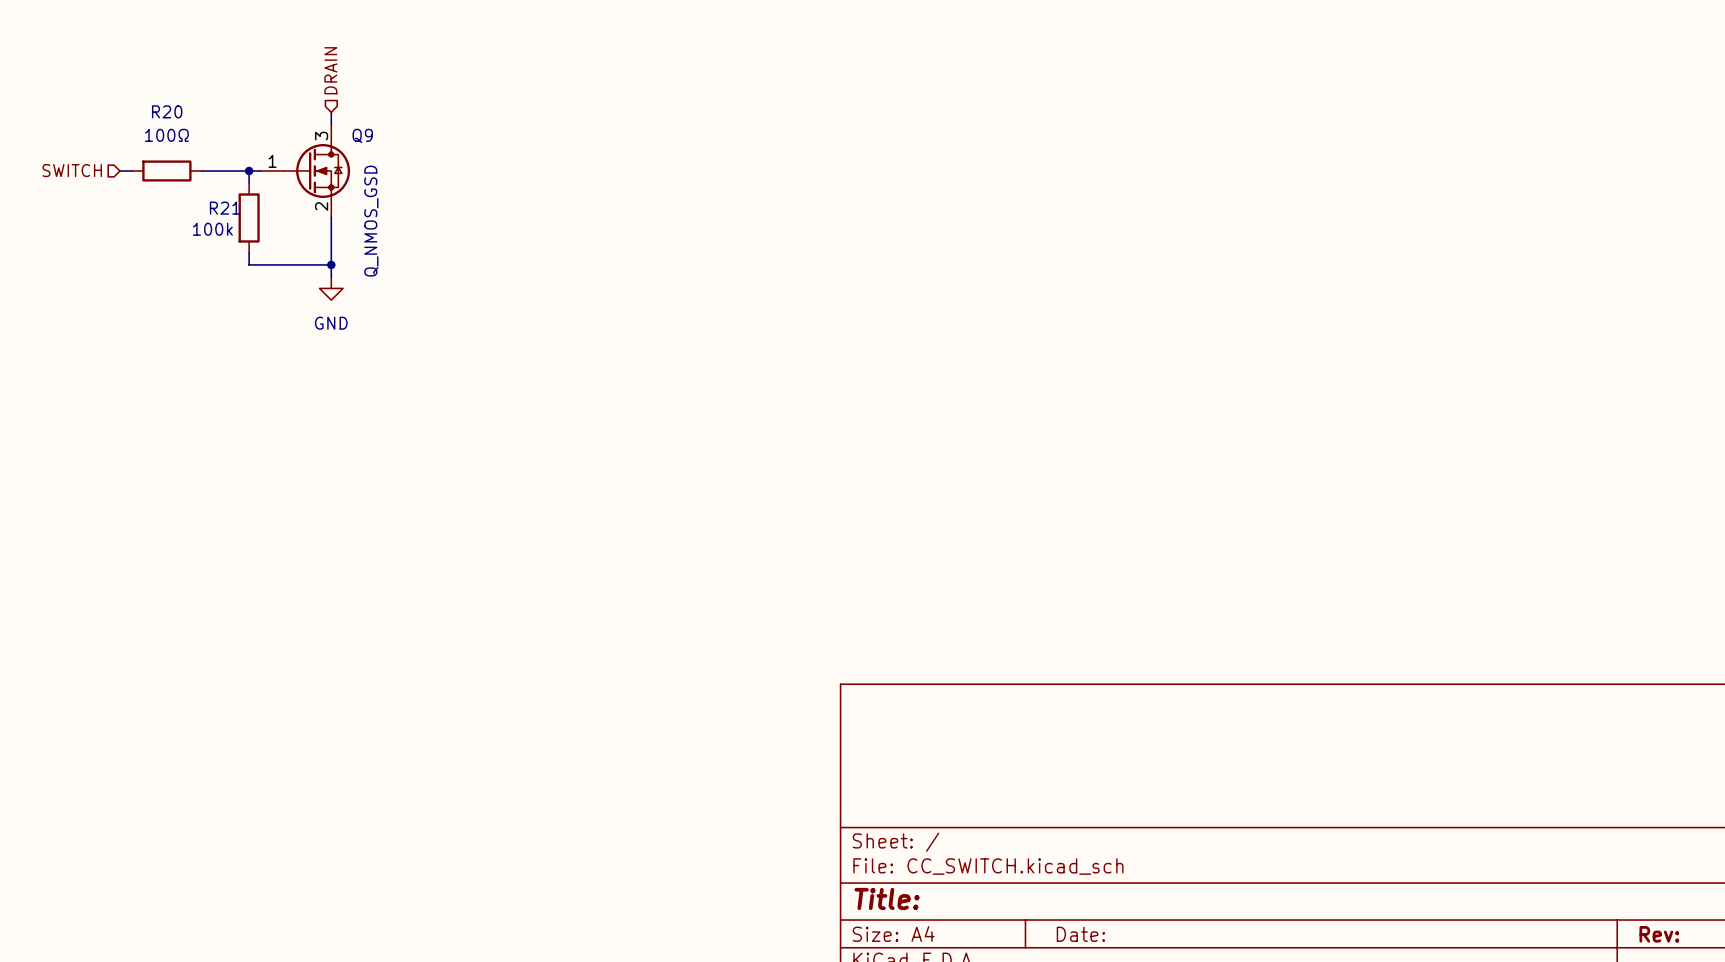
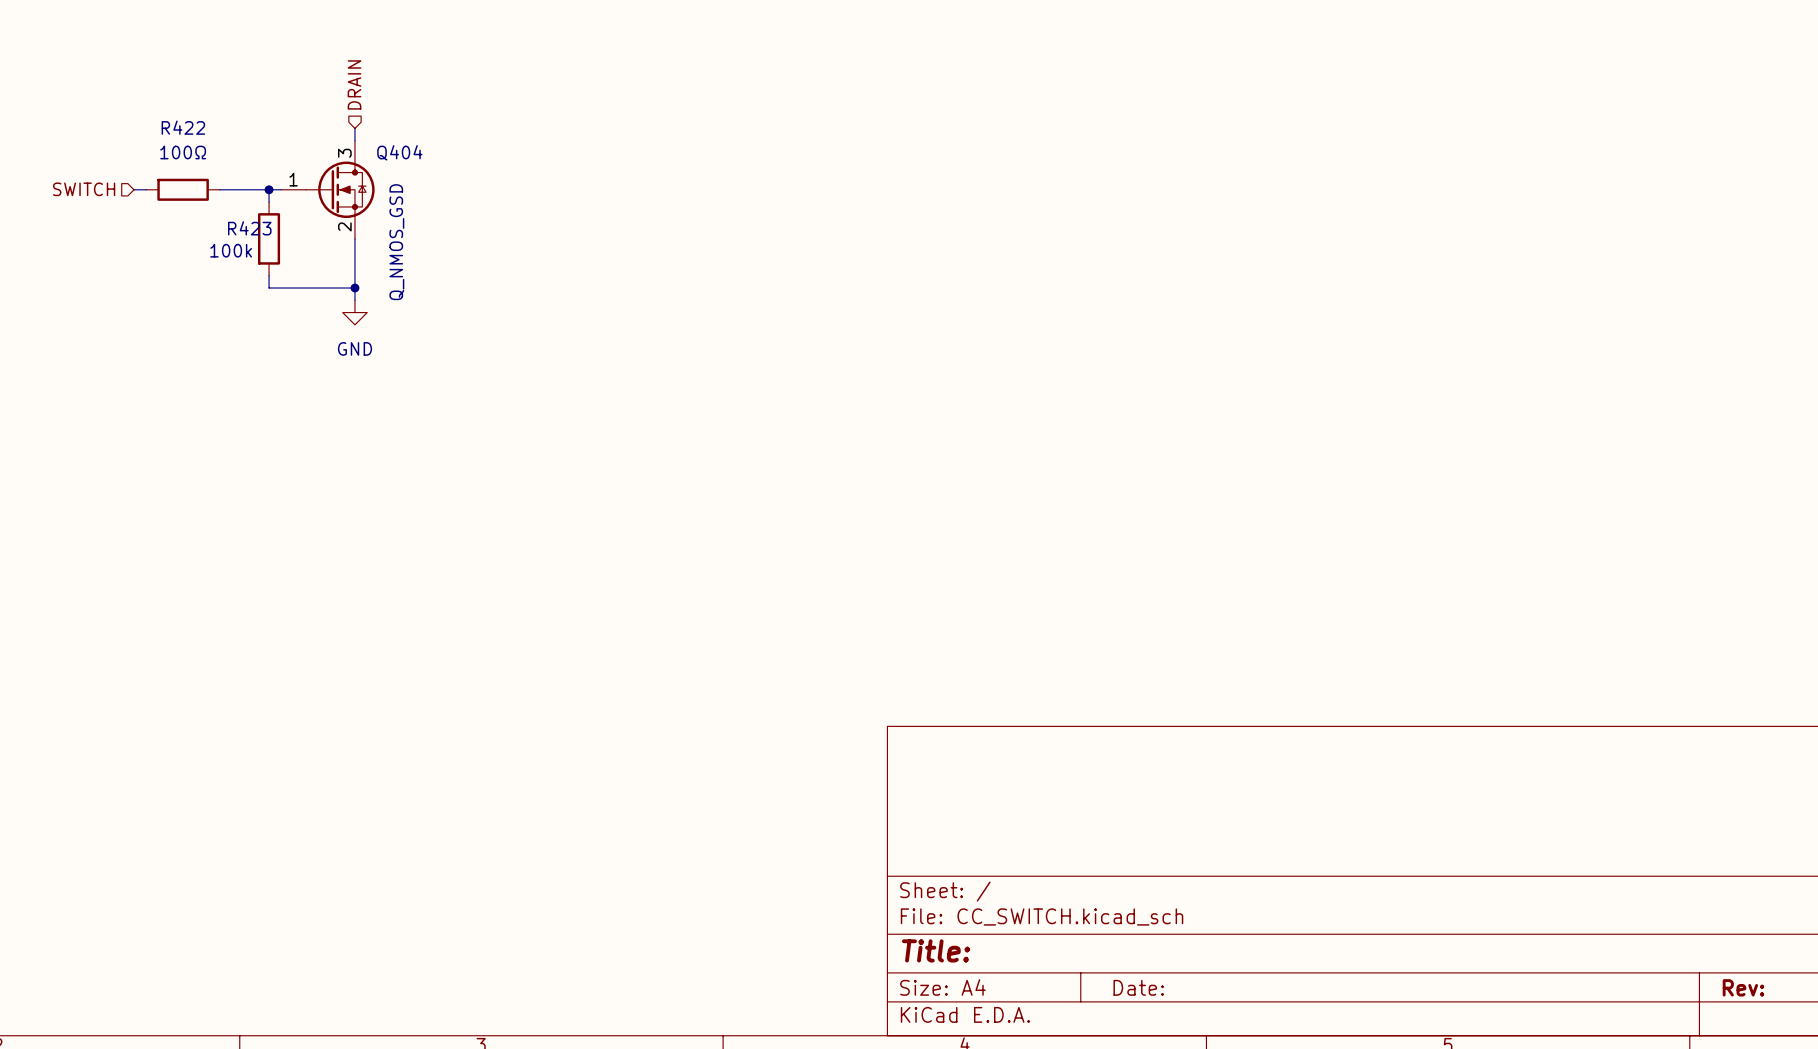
R20 name: R20 (167, 111) -> R422 (183, 127)
Q9 name: Q9 (362, 135) -> Q404 (399, 152)
R21 name: R21 (225, 208) -> R423 (249, 228)

